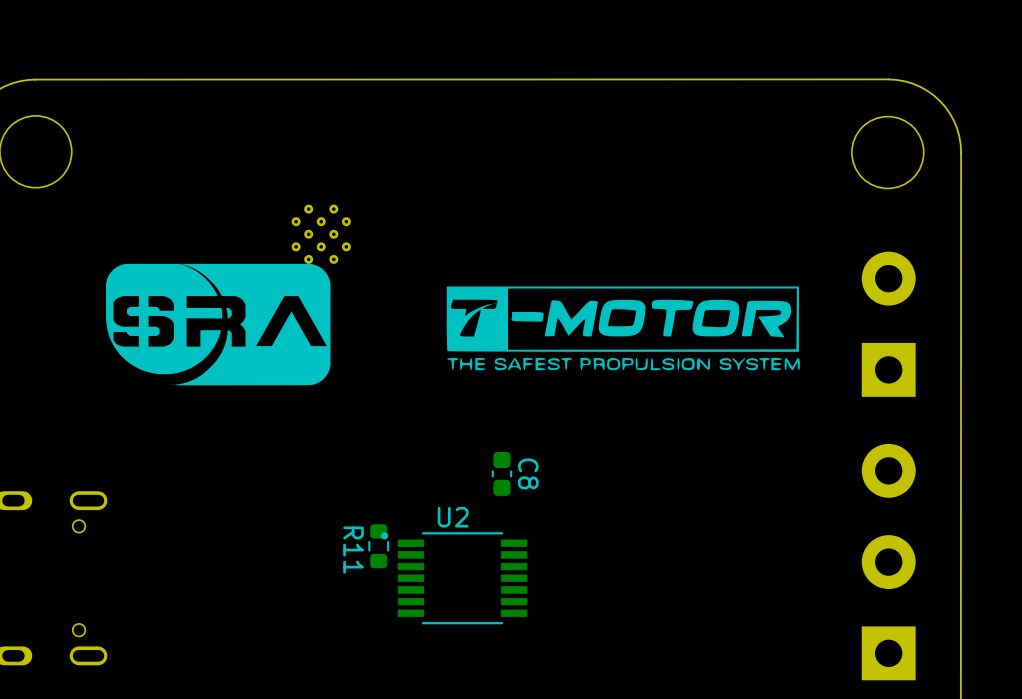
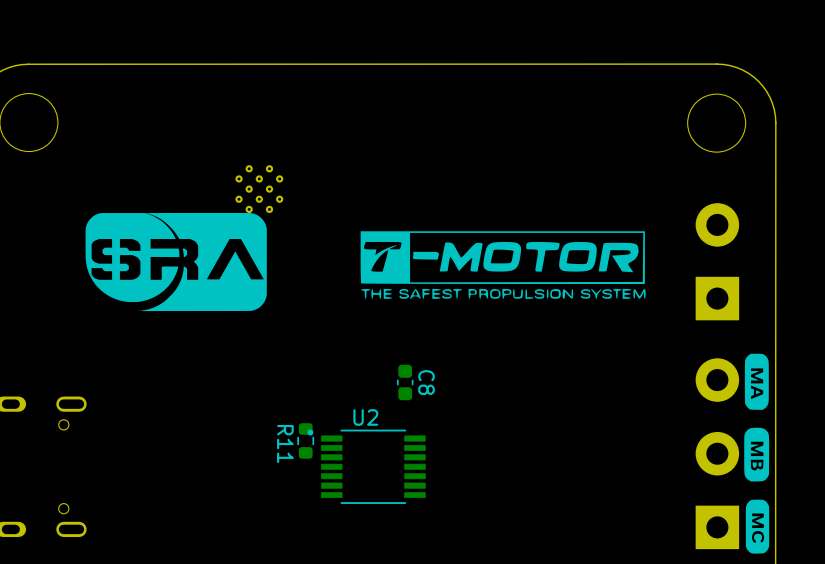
drawing: none -> [744, 353, 769, 410]
drawing: none -> [744, 427, 770, 482]
drawing: none -> [745, 499, 770, 554]

